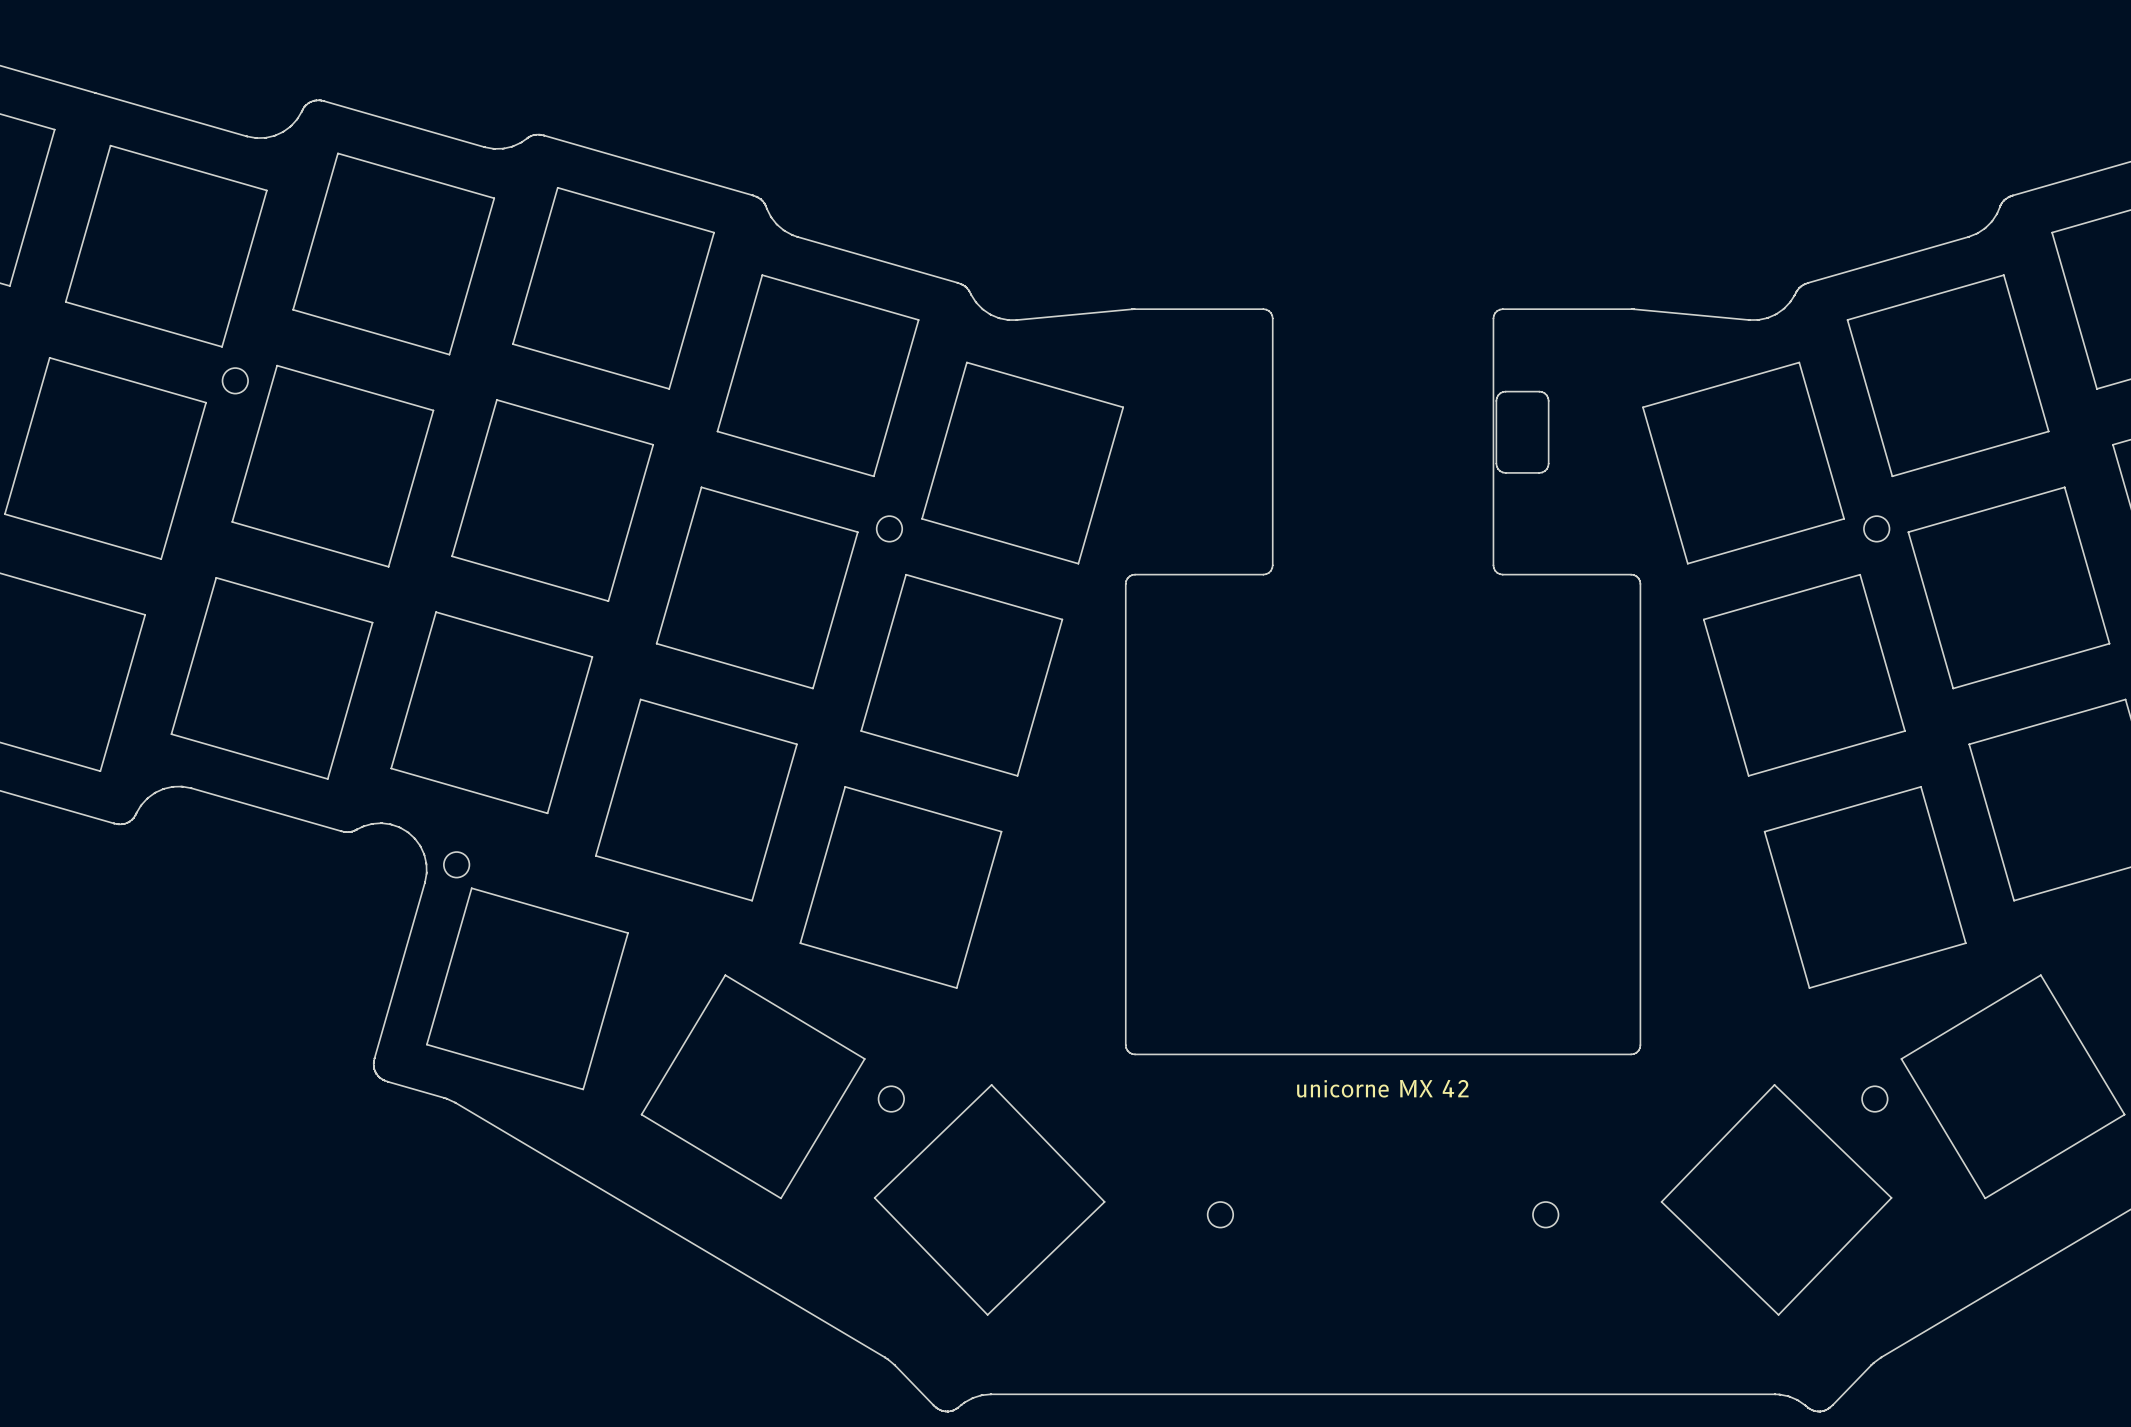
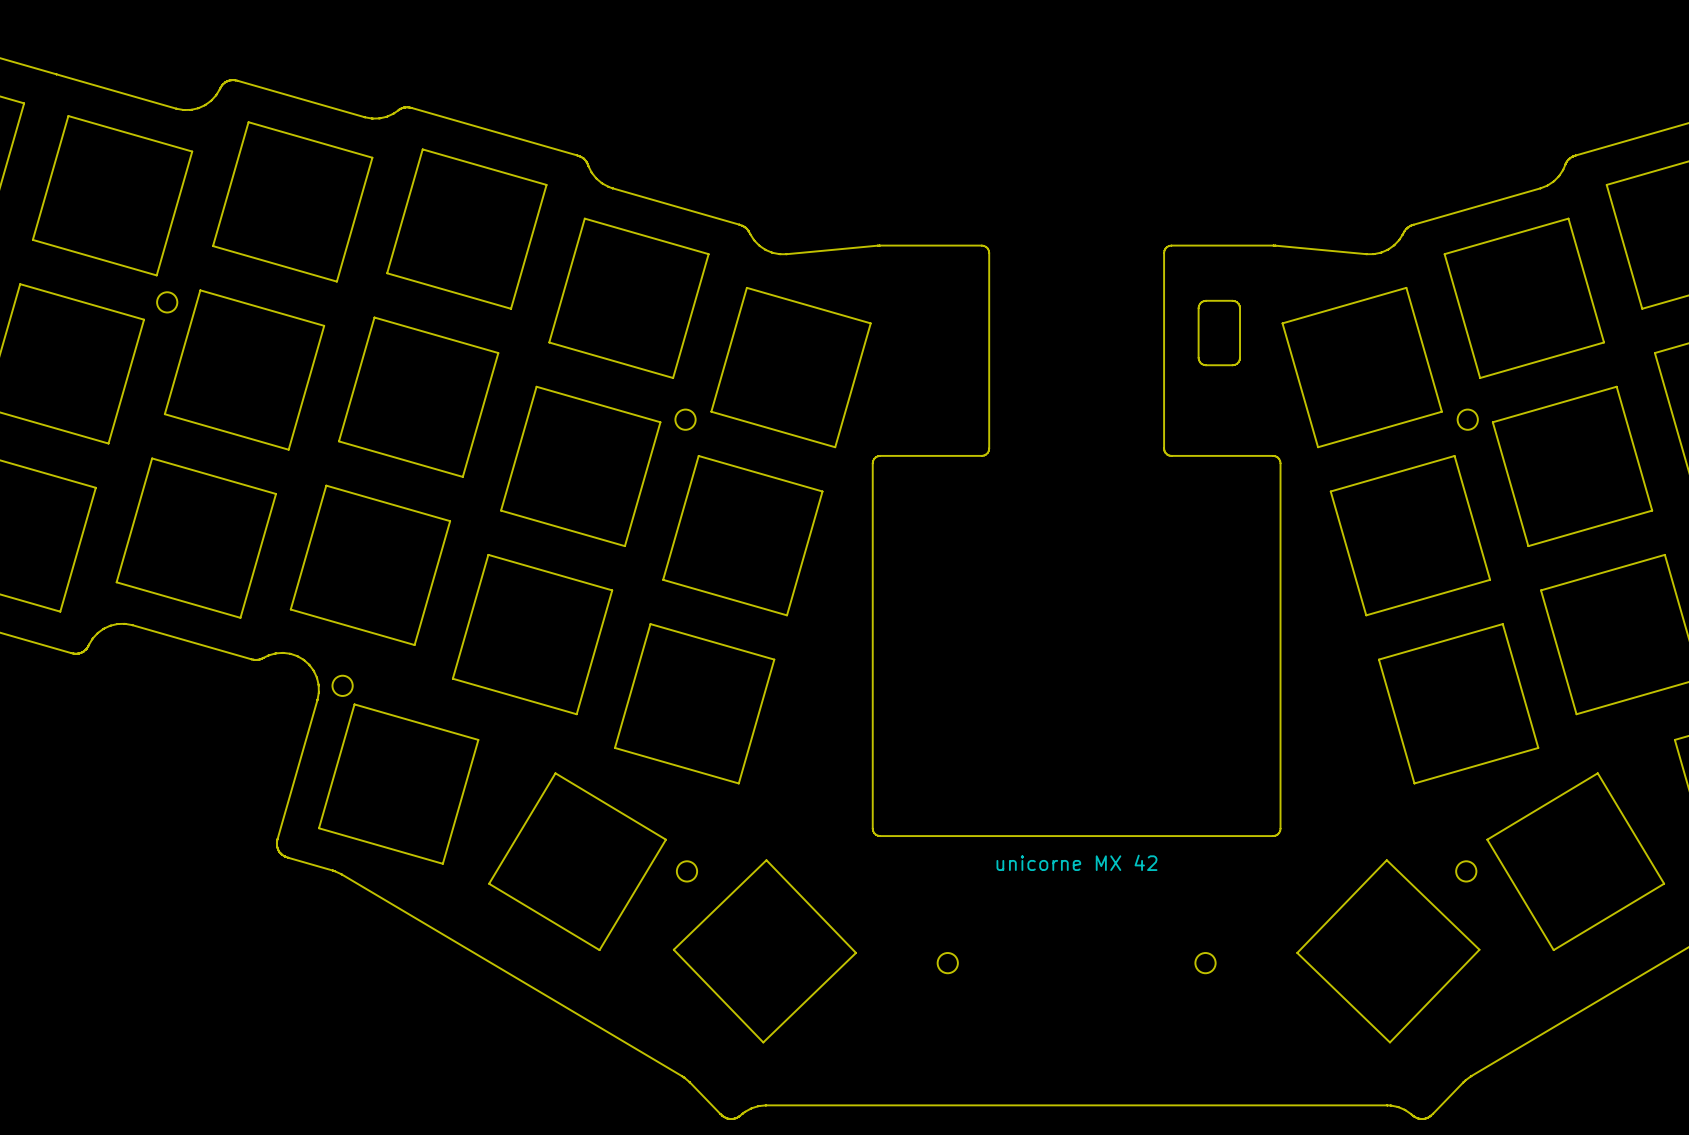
board edge: (1505, 391) (1500, 393) (1496, 400) (1496, 466) (1500, 471) (1505, 472) (1542, 472) (1546, 469) (1548, 463) (1548, 398) (1544, 393) (1539, 391) (1505, 391) -> (1205, 300) (1201, 302) (1198, 308) (1198, 360) (1205, 365) (1234, 364) (1240, 357) (1239, 305) (1232, 300) (1205, 300)

